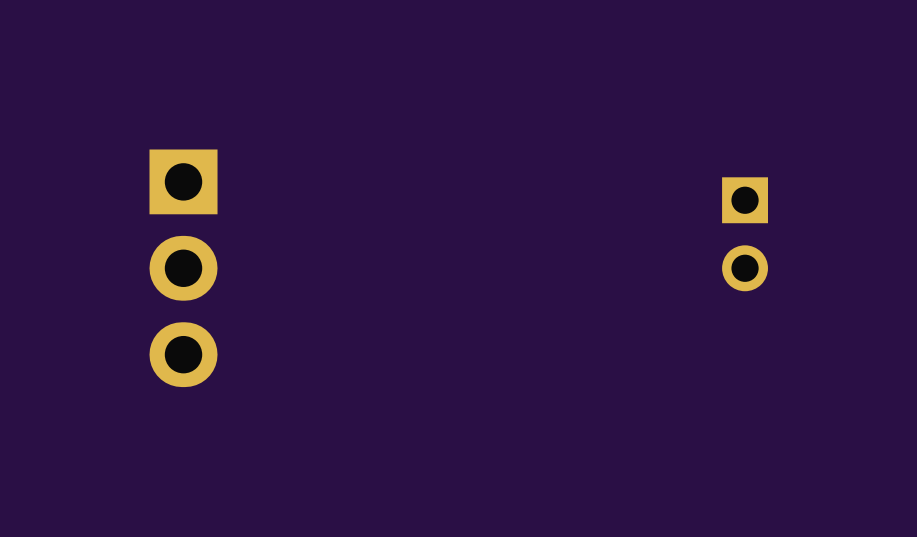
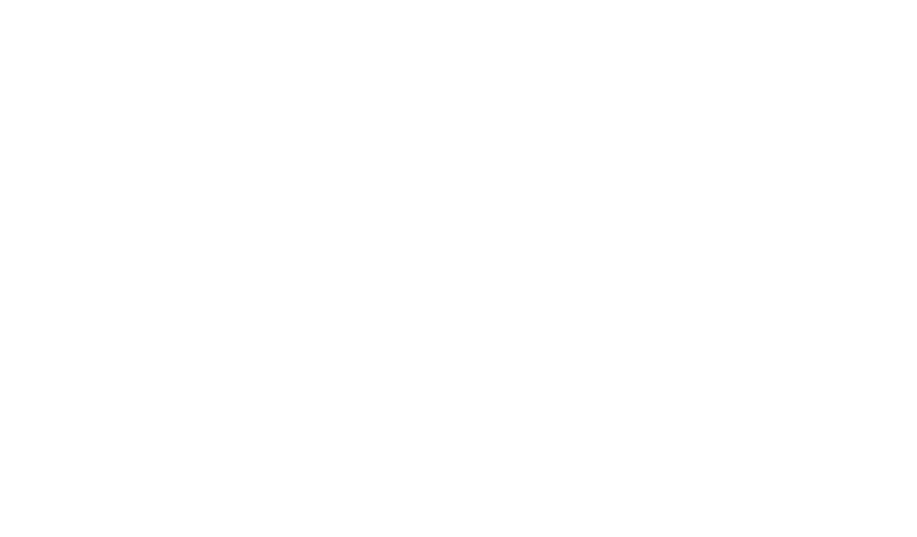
part: (745, 234) -> none
part: (183, 268) -> none

